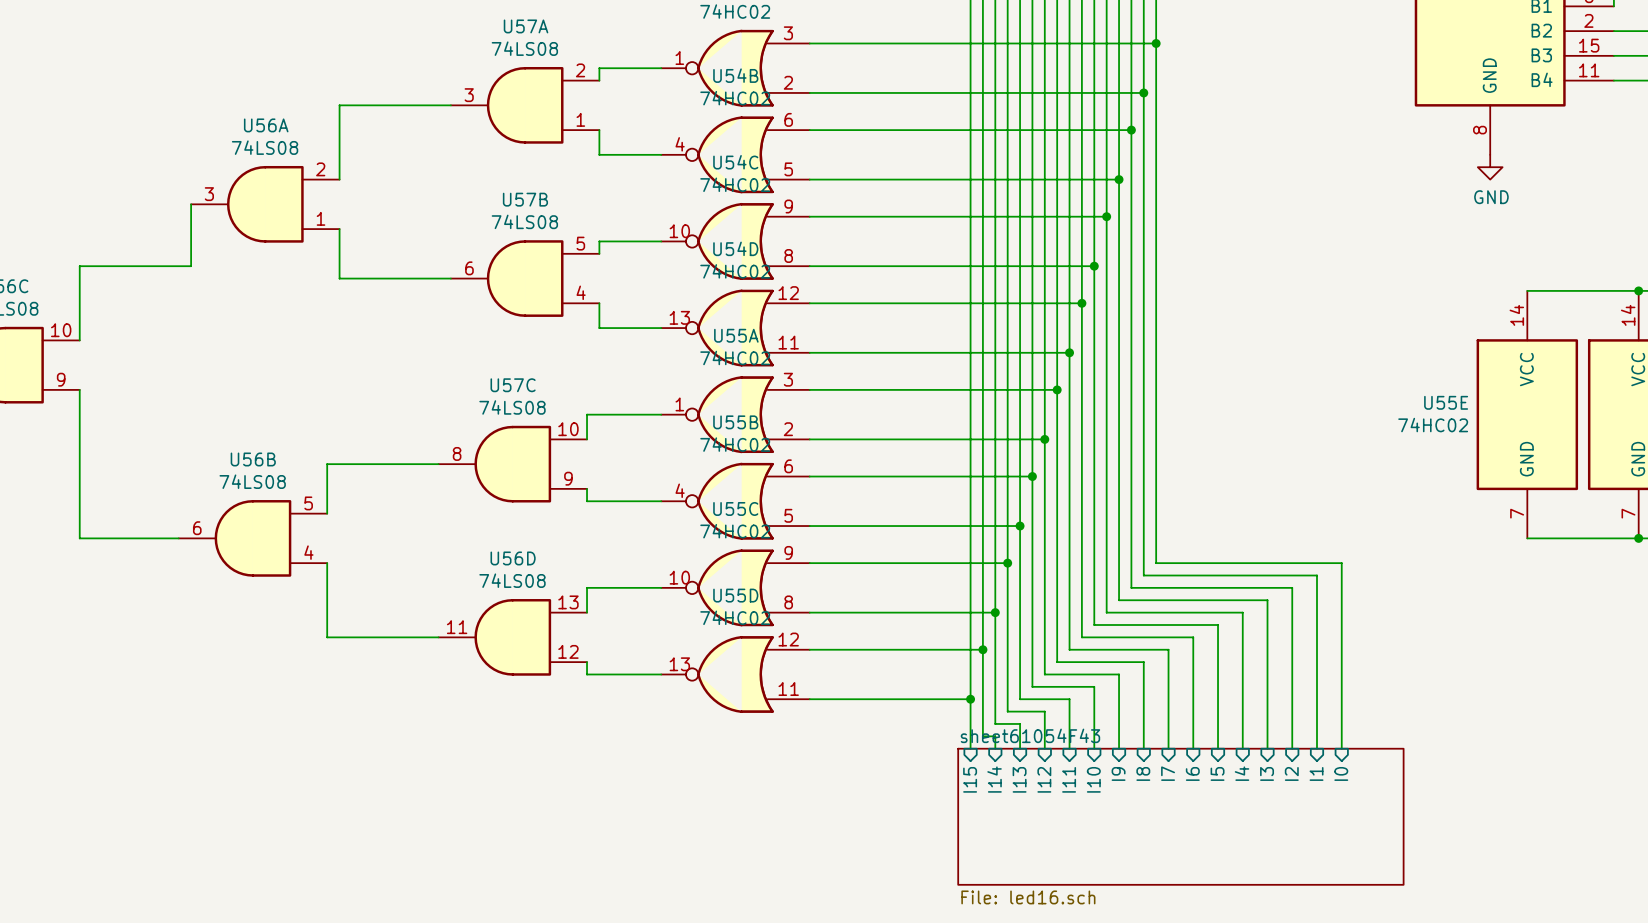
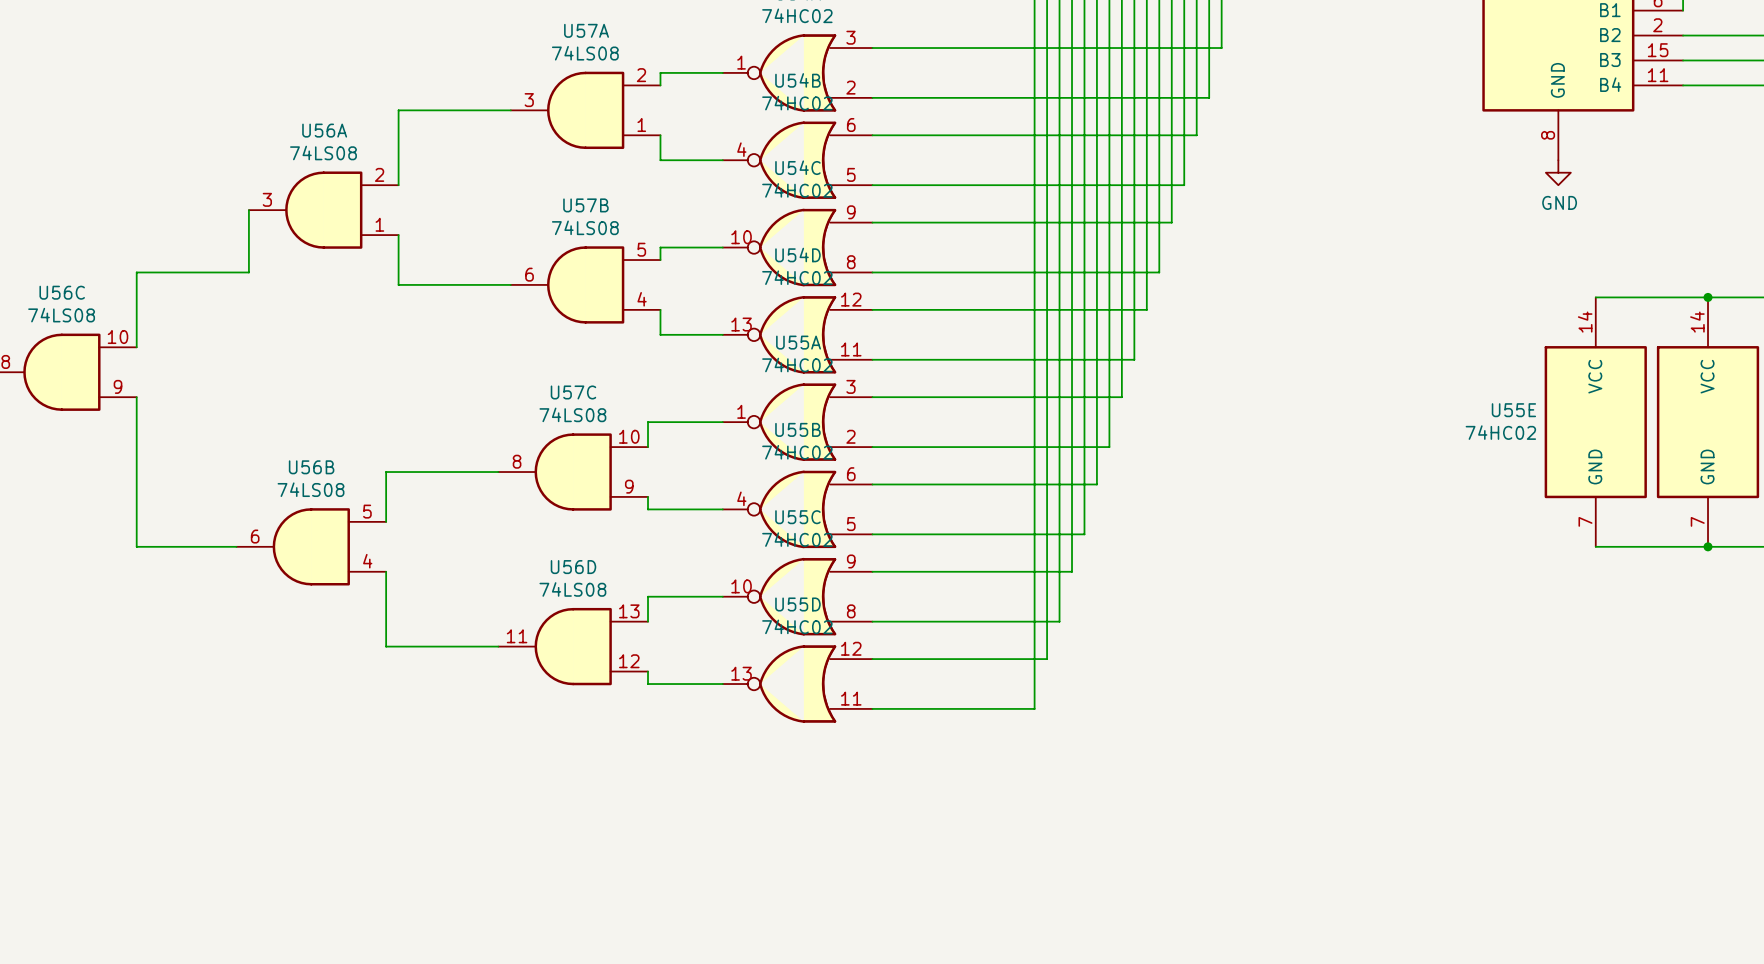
wire: (1156, 43) (1156, 563) (1341, 563) (1341, 748) -> none
junction: (1156, 43) -> none
wire: (1143, 92) (1143, 575) (1316, 575) (1316, 748) -> none
junction: (1143, 92) -> none
wire: (1131, 130) (1131, 587) (1292, 587) (1292, 748) -> none
junction: (1131, 130) -> none
wire: (1119, 179) (1119, 600) (1267, 600) (1267, 748) -> none
junction: (1119, 179) -> none
wire: (1106, 216) (1106, 612) (1242, 612) (1242, 748) -> none
junction: (1106, 216) -> none
wire: (1094, 266) (1094, 624) (1218, 624) (1218, 748) -> none
junction: (1094, 266) -> none
wire: (1081, 303) (1081, 637) (1193, 637) (1193, 748) -> none
junction: (1081, 303) -> none
wire: (1069, 352) (1069, 649) (1168, 649) (1168, 748) -> none
junction: (1069, 352) -> none
wire: (1057, 389) (1057, 662) (1143, 662) (1143, 748) -> none
junction: (1057, 389) -> none
wire: (1044, 439) (1044, 674) (1119, 674) (1119, 748) -> none
junction: (1044, 439) -> none
wire: (1032, 476) (1032, 686) (1094, 686) (1094, 748) -> none
junction: (1032, 476) -> none
wire: (1020, 526) (1020, 699) (1069, 699) (1069, 748) -> none
junction: (1020, 526) -> none
wire: (1007, 563) (1007, 711) (1044, 711) (1044, 748) -> none
junction: (1007, 563) -> none
wire: (995, 612) (995, 723) (1020, 723) (1020, 748) -> none
junction: (995, 612) -> none
wire: (982, 649) (982, 736) (995, 736) (995, 748) -> none
junction: (982, 649) -> none
wire: (970, 699) (970, 748) -> none
junction: (970, 699) -> none
sheet pin: I9 (1118, 773) -> none
sheet pin: I8 (1143, 773) -> none
sheet pin: I7 (1168, 773) -> none
sheet pin: I6 (1192, 773) -> none
sheet pin: I5 (1217, 773) -> none
sheet pin: I4 (1242, 773) -> none
sheet pin: I3 (1267, 773) -> none
sheet pin: I2 (1291, 773) -> none
sheet pin: I1 (1316, 773) -> none
sheet pin: I0 (1341, 773) -> none
sheet pin: I15 (970, 779) -> none
sheet pin: I14 (994, 779) -> none
sheet pin: I13 (1019, 779) -> none
sheet pin: I12 (1044, 779) -> none
sheet pin: I11 (1069, 779) -> none
sheet pin: I10 (1093, 779) -> none
sheet sheet61054F43: File: led16.sch (1180, 816) -> none

